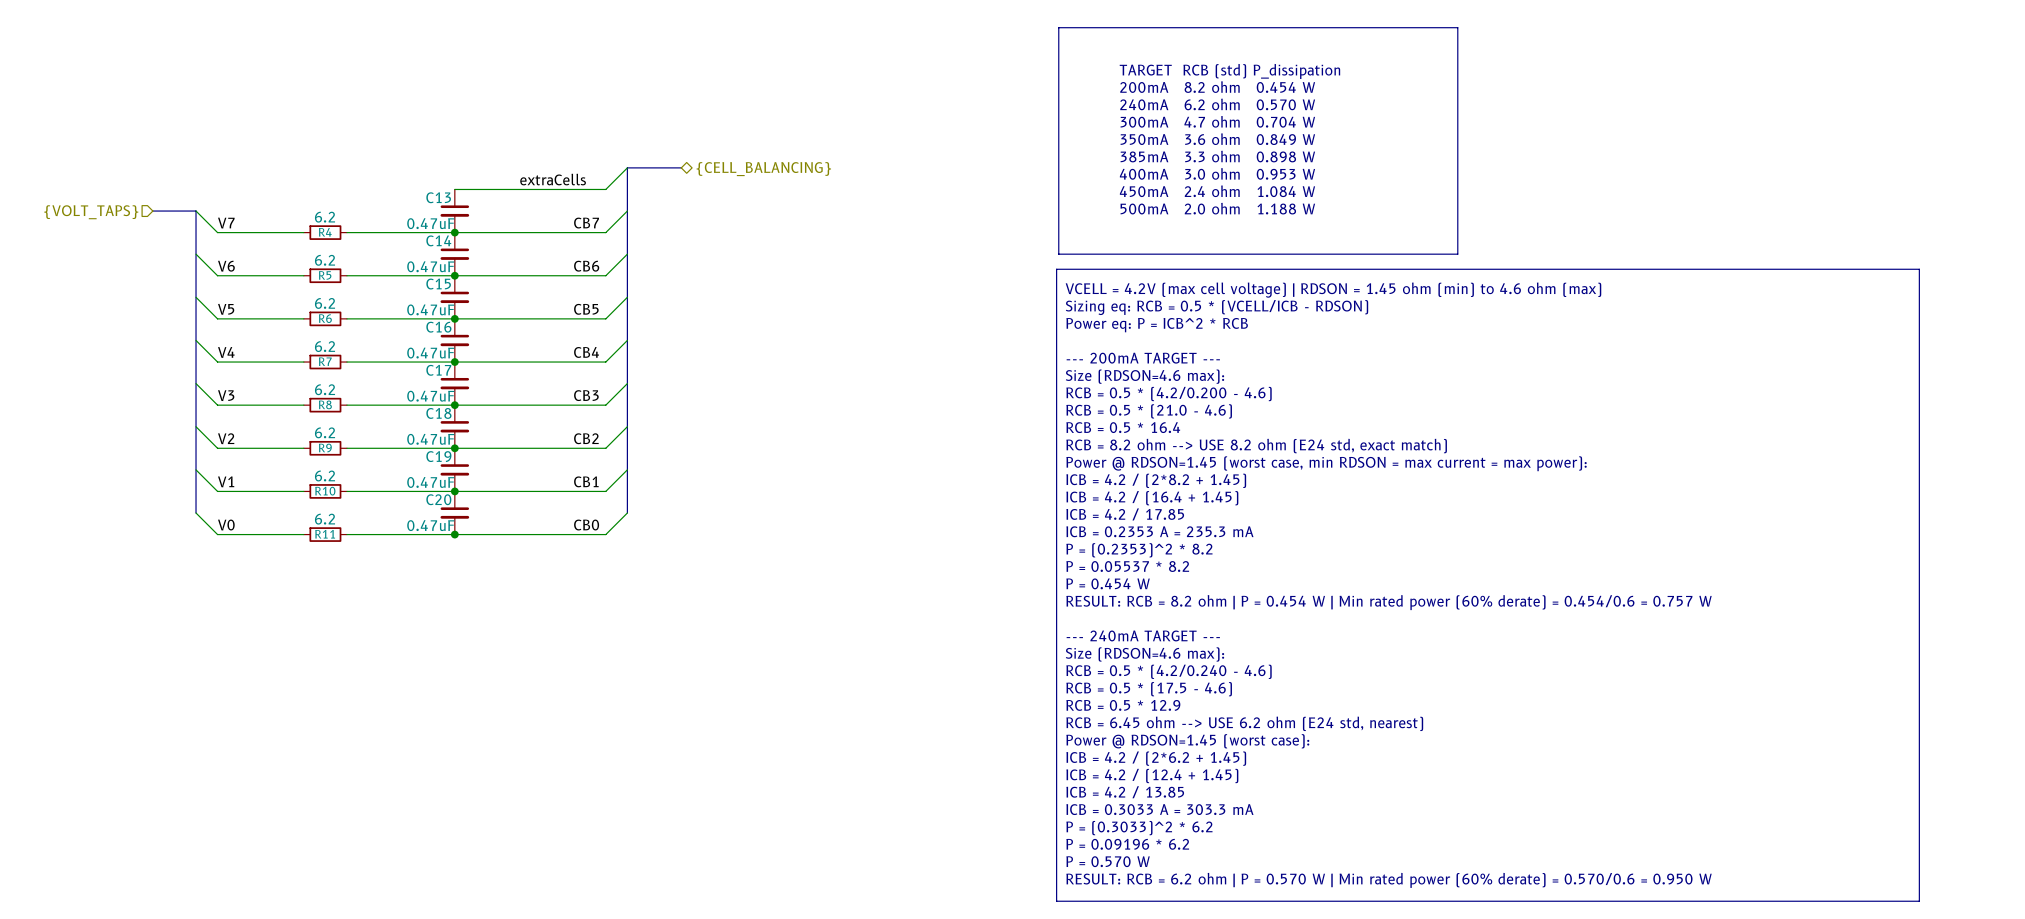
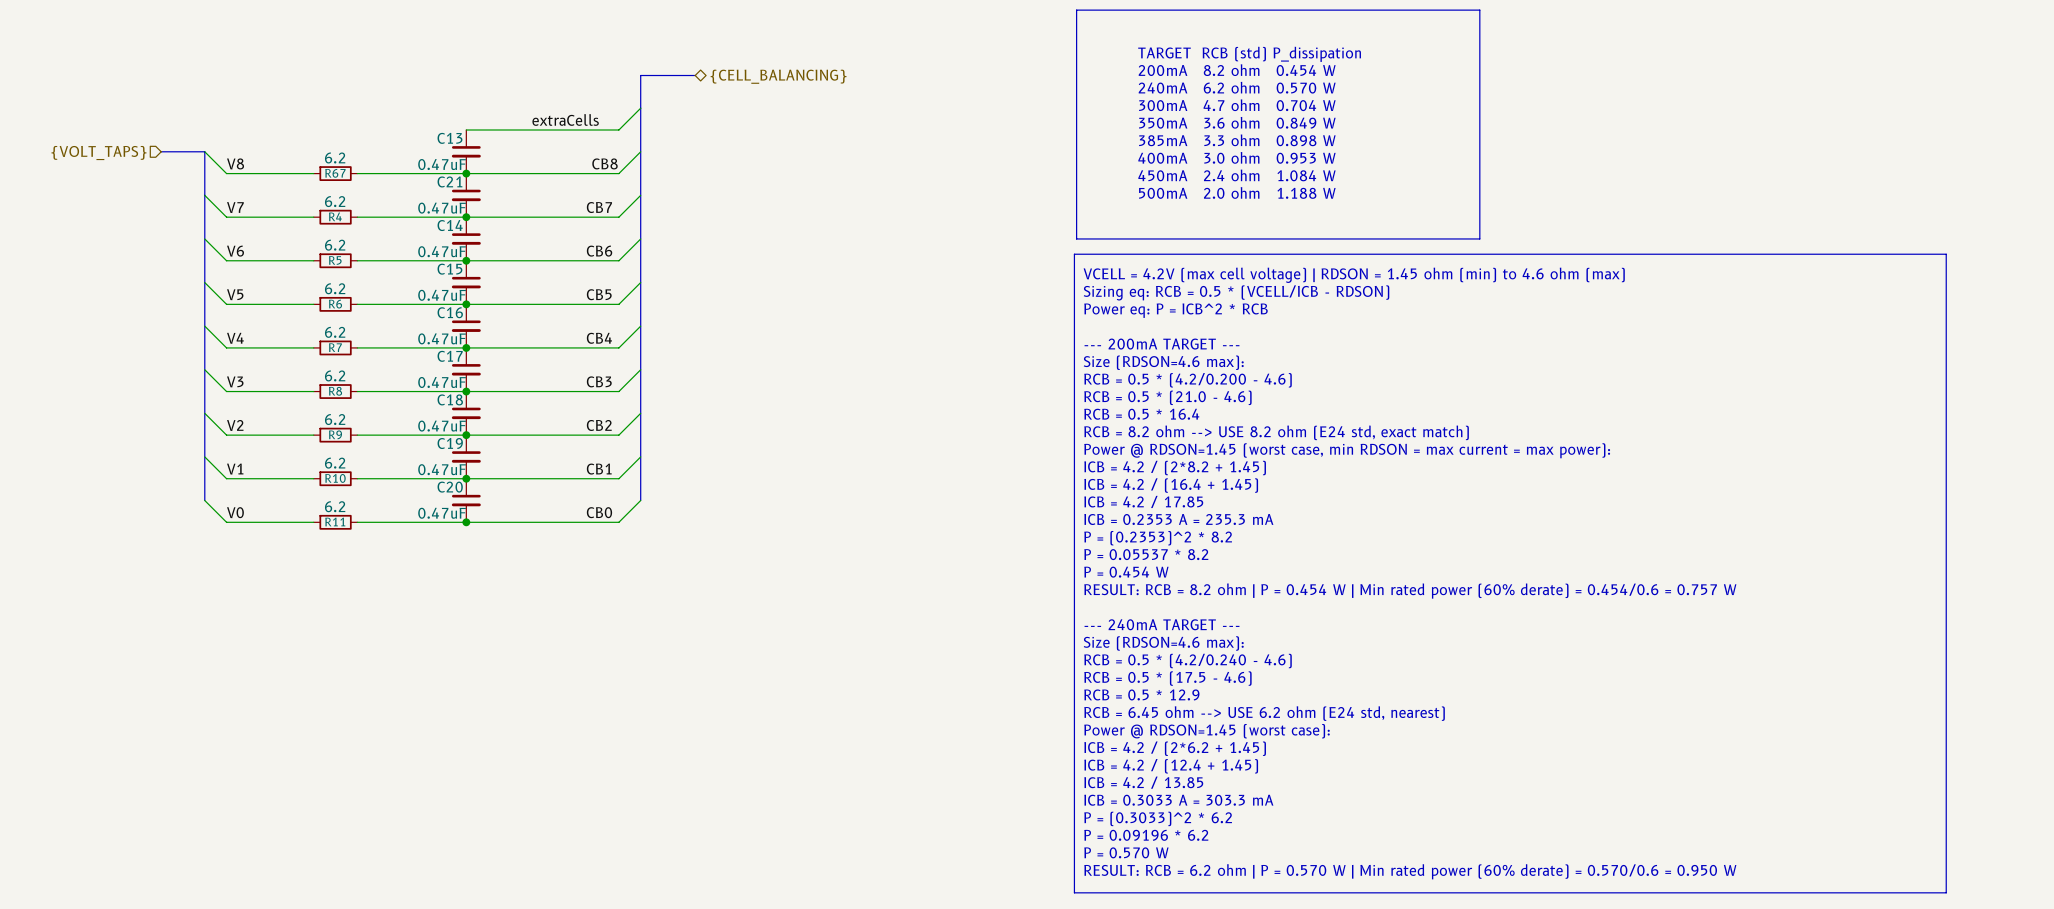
wire: none -> (640, 108) (618, 129) (466, 129)
wire: none -> (204, 151) (226, 173) (313, 173)
C13: none -> 0.47uF (466, 151)
bus: (627, 167) (681, 167) -> (640, 151) (640, 75) (695, 75)
hierarchical label position: {CELL_BALANCING} (763, 169) -> {CELL_BALANCING} (778, 76)
label: none -> V8 (235, 163)
label position: extraCells (553, 179) -> extraCells (565, 119)
label: none -> CB8 (605, 163)
R67: none -> 6.2 (335, 173)
wire: none -> (357, 173) (466, 173)
junction: none -> (466, 173)
C13 name: C13 (438, 197) -> C21 (449, 181)
bus: (152, 211) (196, 211) -> (161, 151) (204, 151) (204, 195)
hierarchical label position: {VOLT_TAPS} (91, 212) -> {VOLT_TAPS} (98, 153)

